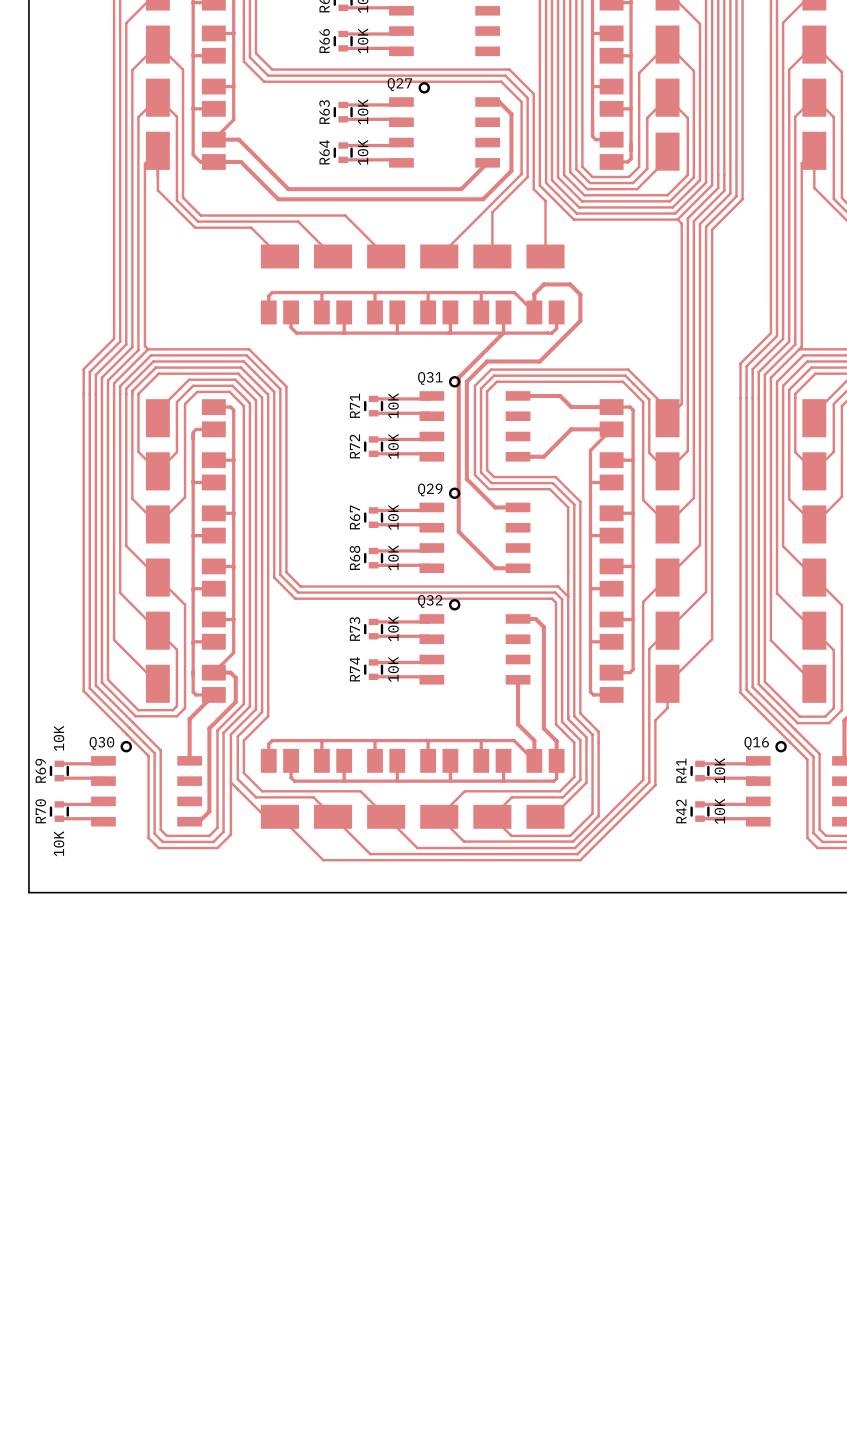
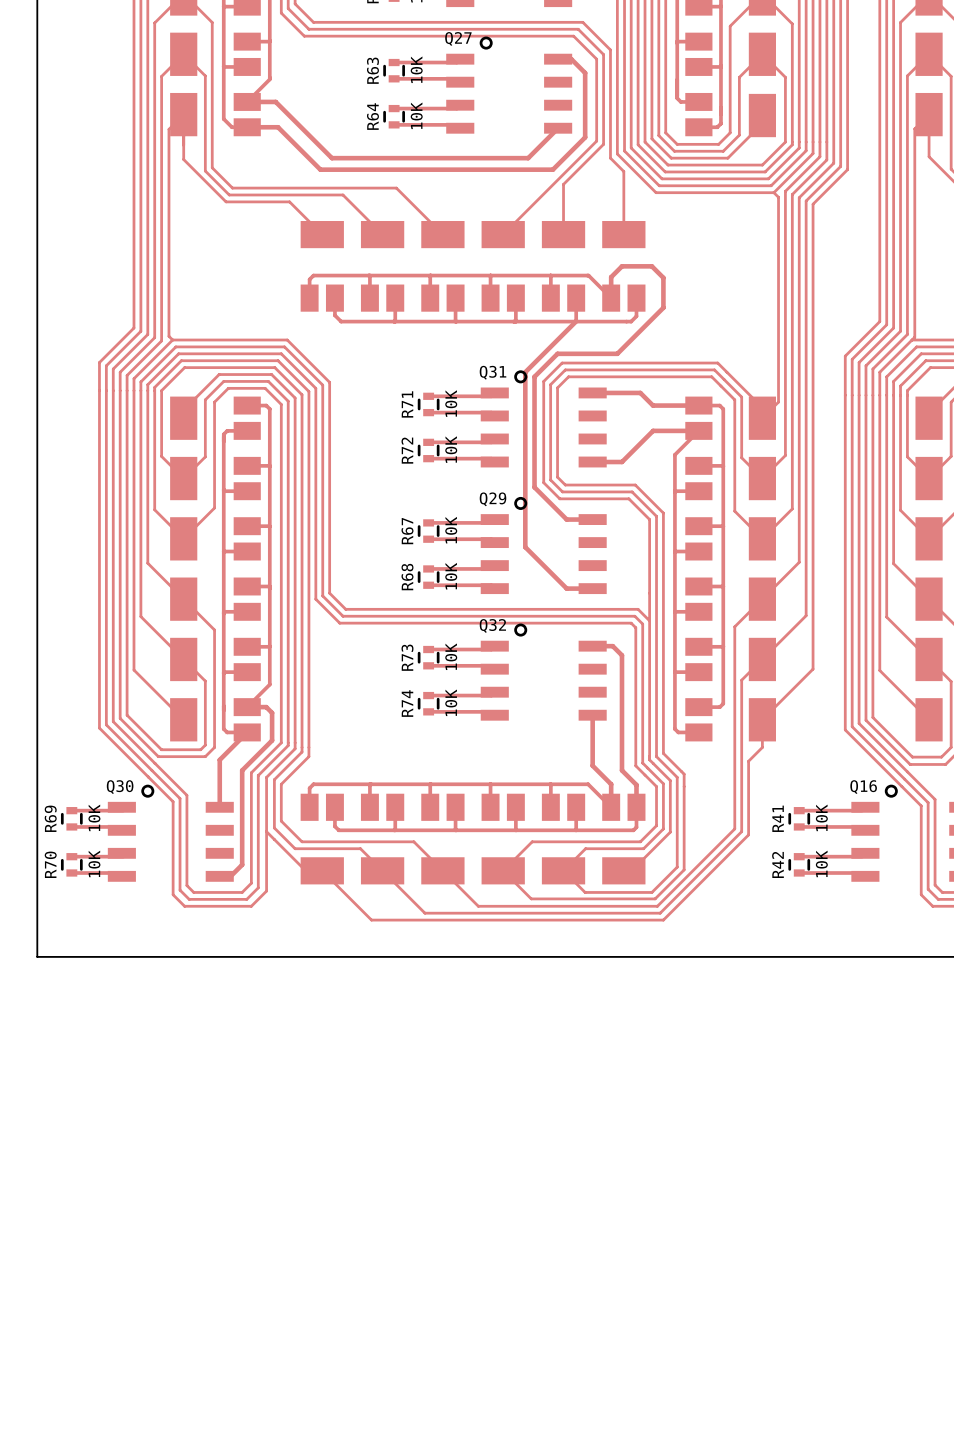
R69 value position: 10K (58, 738) -> 10K (94, 817)
R70 value position: 10K (58, 843) -> 10K (94, 863)

